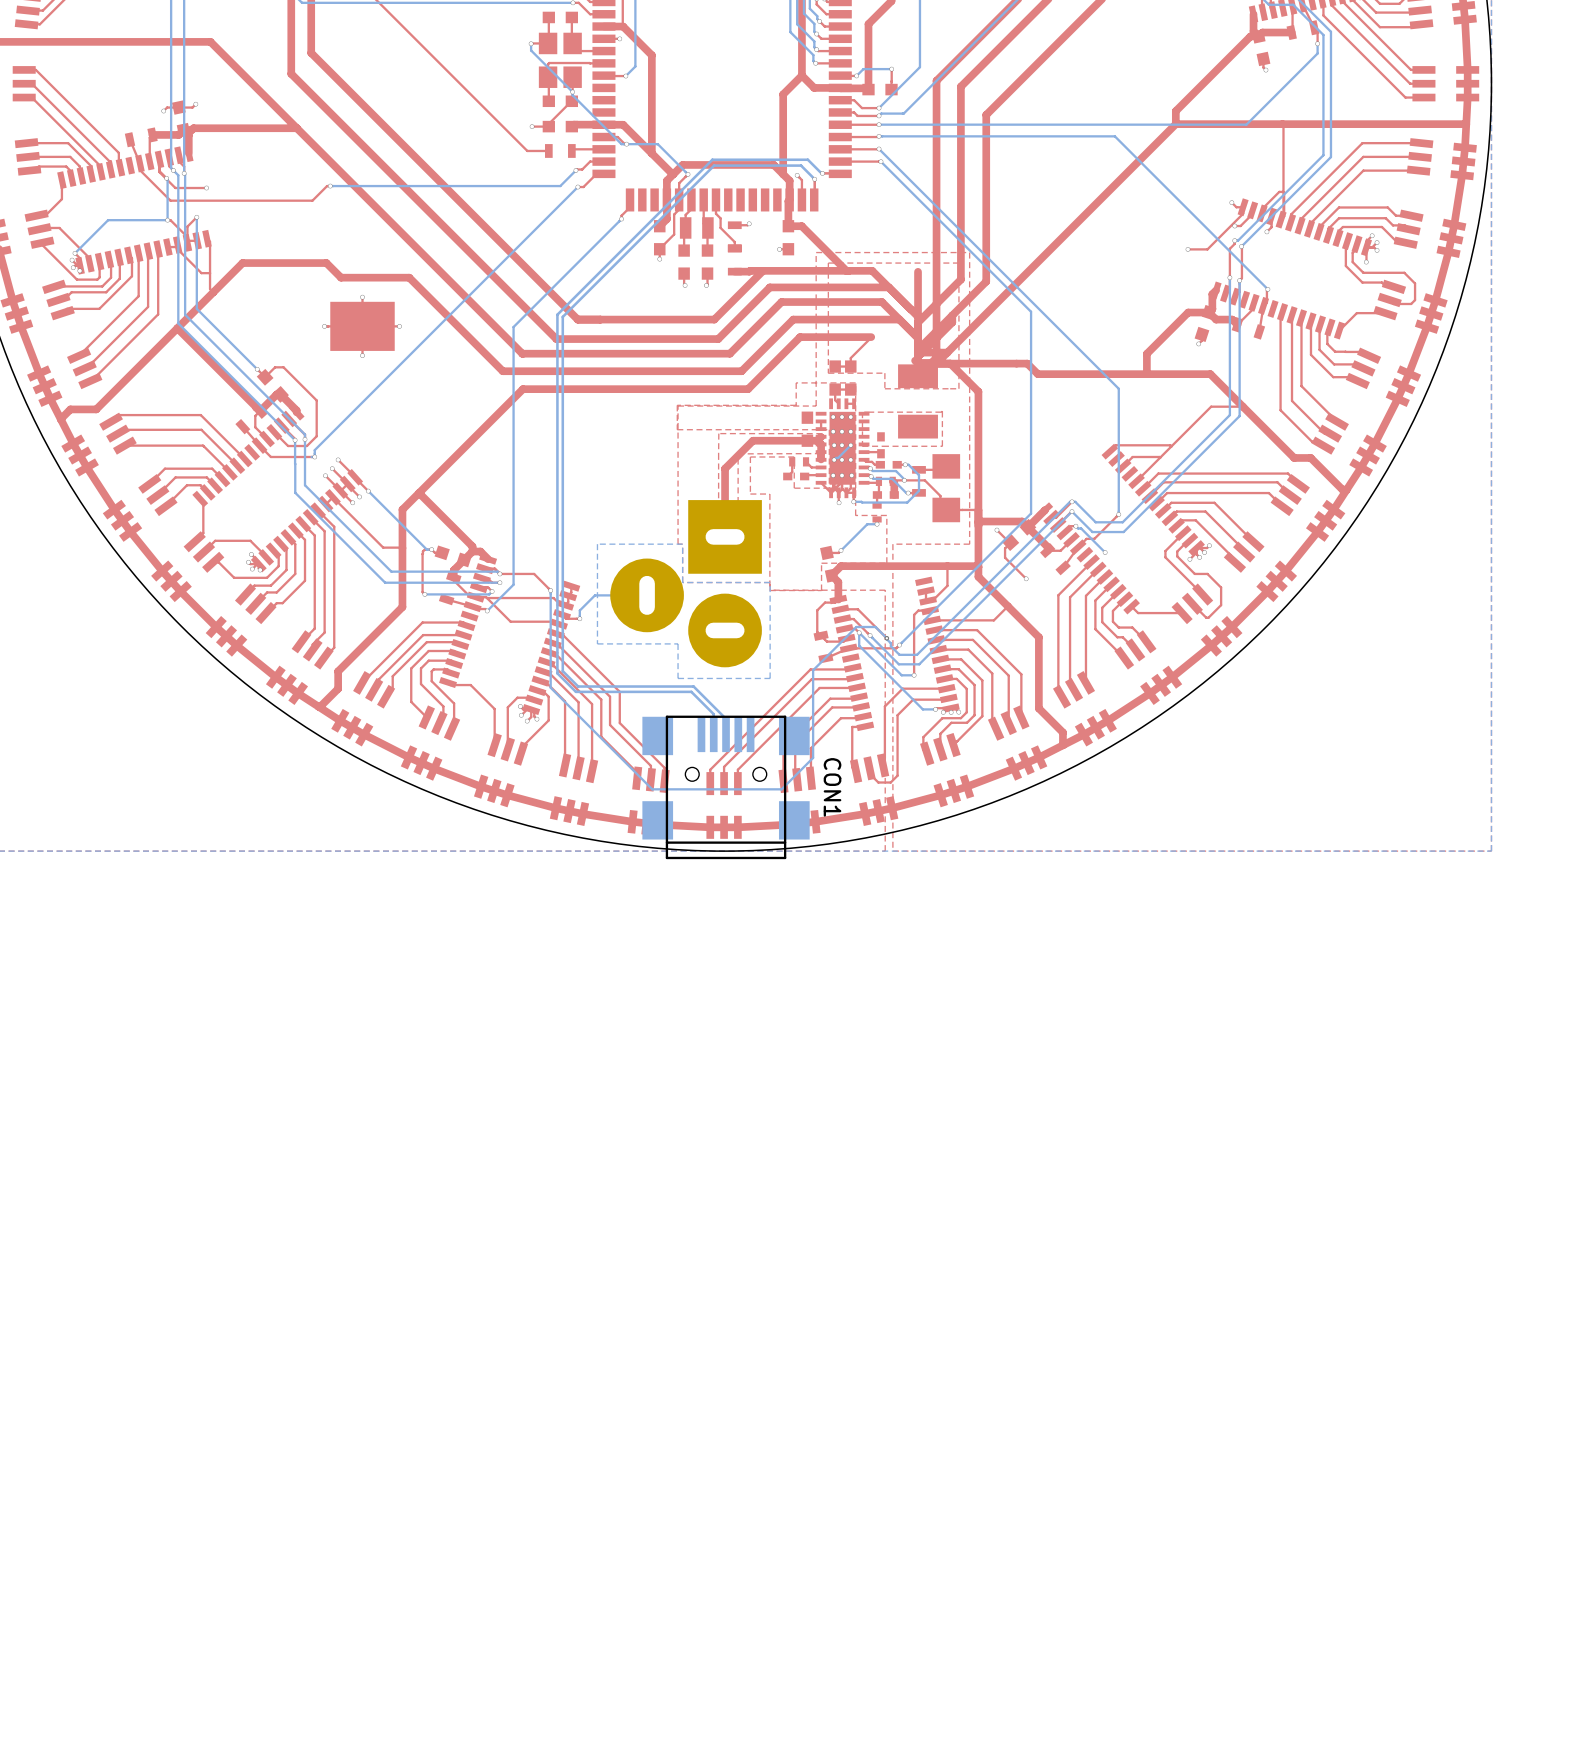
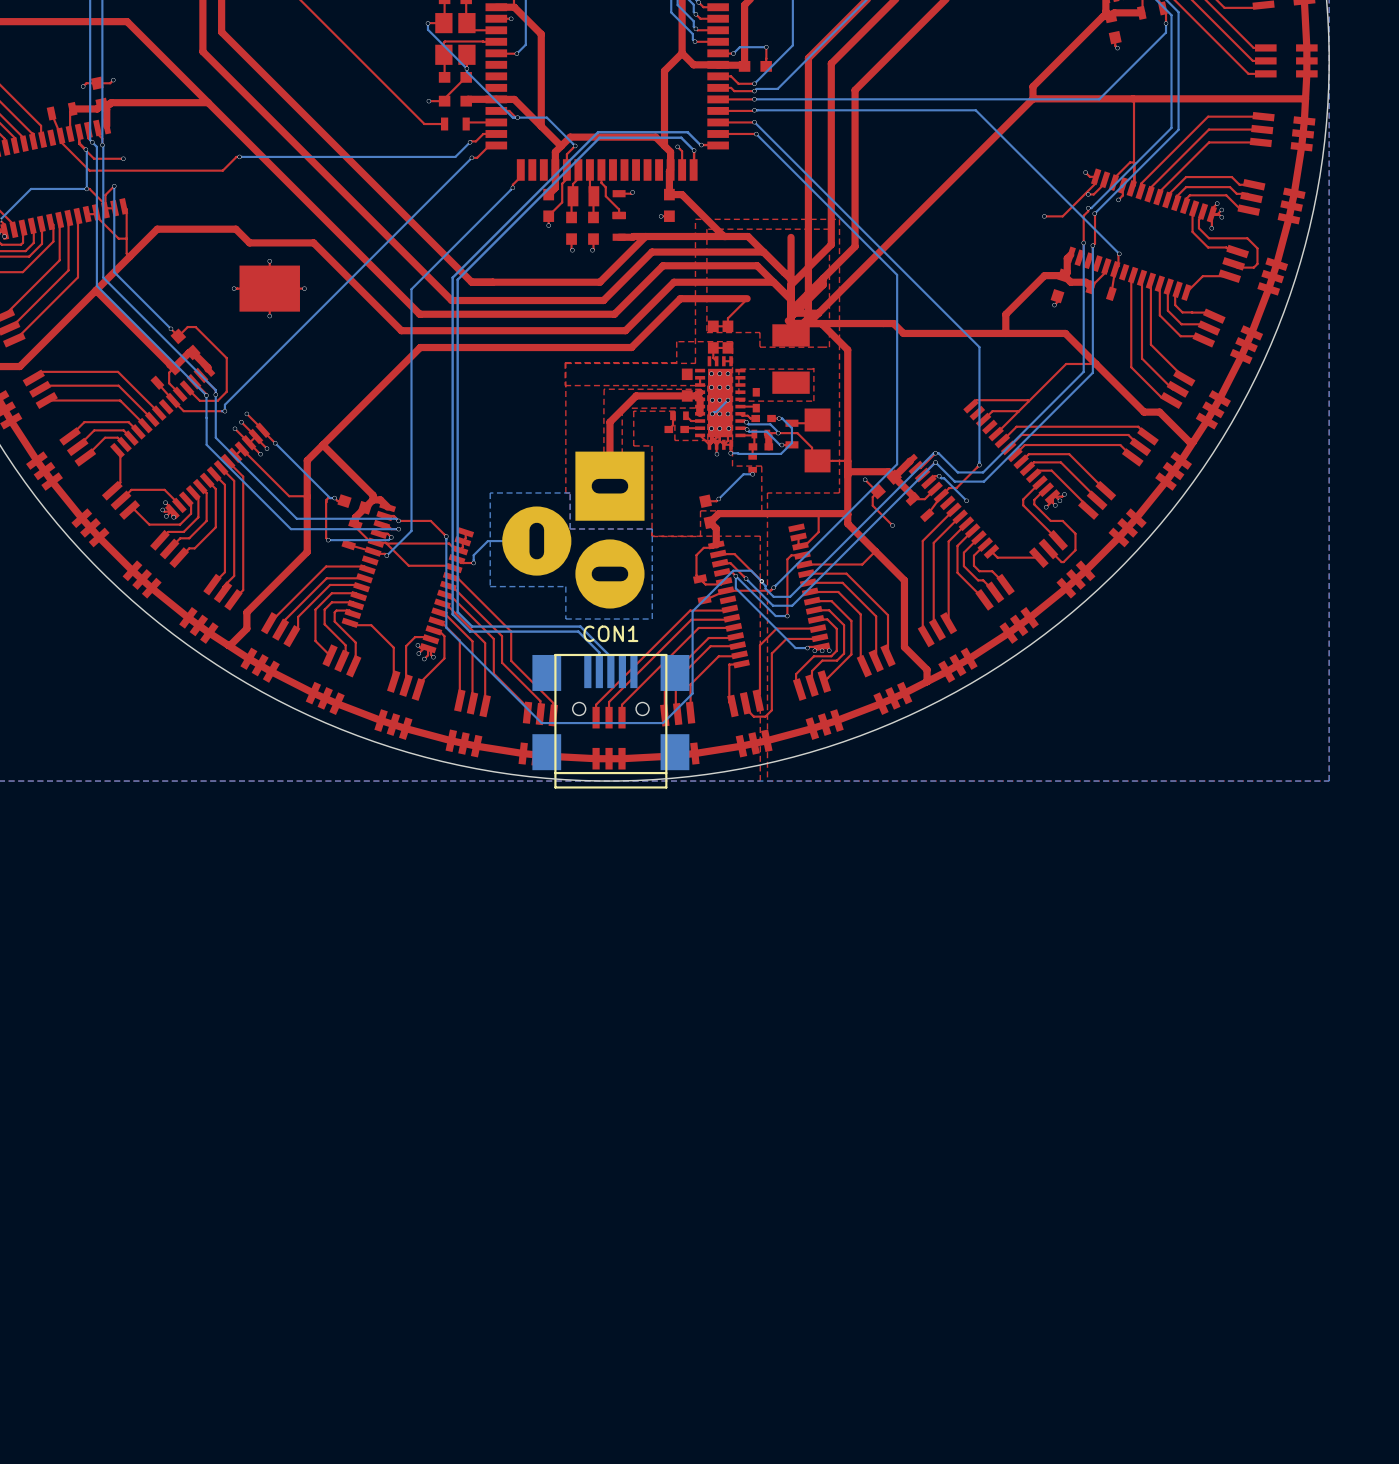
CON1 name rotation: 0° (832, 787) -> 90° counterclockwise (610, 633)
CON1 name position: CON1 (832, 787) -> CON1 (610, 633)

